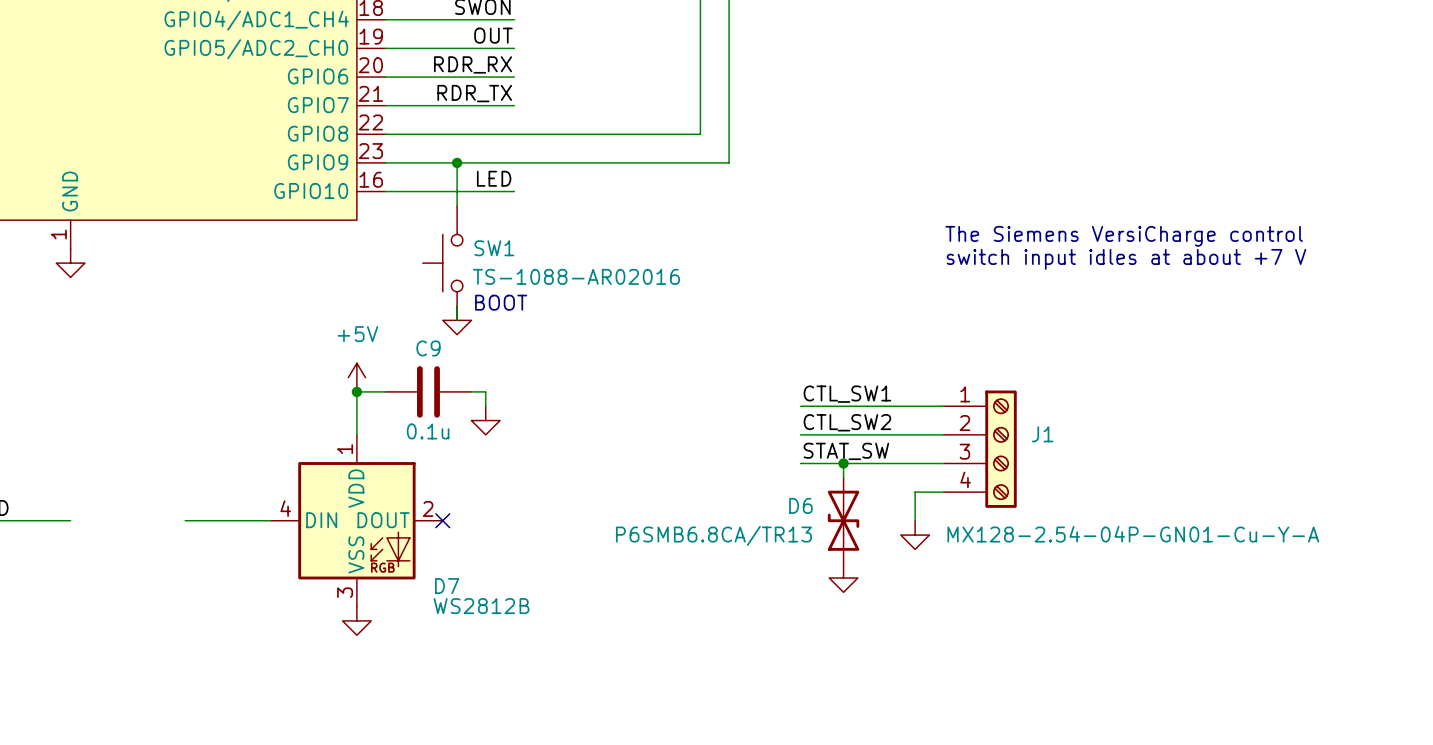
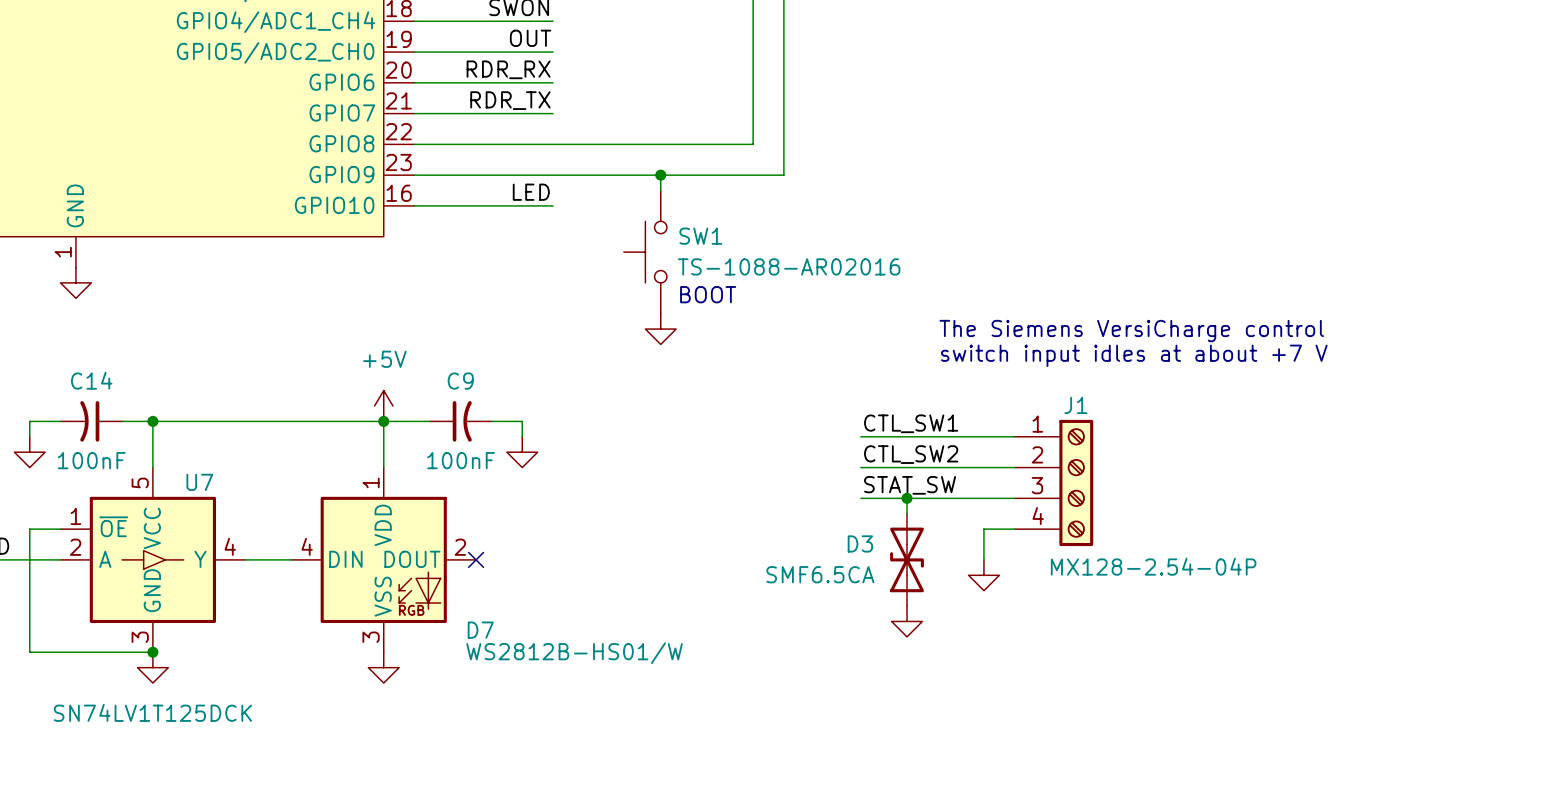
wire: (457, 162) (457, 205) -> none
junction: (457, 162) -> none
junction: none -> (660, 175)
text position: The Siemens VersiCharge control (1124, 236) -> The Siemens VersiCharge control (1131, 331)
text position: switch input idles at about +7 V (1126, 259) -> switch input idles at about +7 V (1134, 355)
SW1 position: (442, 263) -> (645, 252)
text position: BOOT (501, 302) -> BOOT (708, 294)
wire: (457, 306) (457, 320) -> (660, 175) (660, 190)
power symbol position: (457, 320) -> (660, 329)
C9 symbol: [385, 366, 472, 418] -> [429, 401, 492, 442]
wire: none -> (60, 421) (29, 421) (29, 436)
C14: none -> 100nF (91, 421)
wire: none -> (122, 421) (383, 421)
wire: none -> (152, 421) (152, 467)
junction: none -> (152, 421)
power symbol: none -> (29, 452)
C9 value: 0.1u (428, 431) -> 100nF (461, 460)
J1 name position: J1 (1042, 434) -> J1 (1075, 405)
wire: none -> (60, 529) (29, 529) (29, 652) (152, 652)
D6 name: D6 (800, 505) -> D3 (860, 543)
U7: none -> SN74LV1T125DCK (152, 559)
J1 value: MX128-2.54-04P-GN01-Cu-Y-A (1133, 534) -> MX128-2.54-04P (1153, 566)
D6 value: P6SMB6.8CA/TR13 (713, 535) -> SMF6.5CA (820, 574)
junction: none -> (152, 652)
D7 value: WS2812B (481, 606) -> WS2812B-HS01/W (574, 653)
power symbol: none -> (152, 667)

